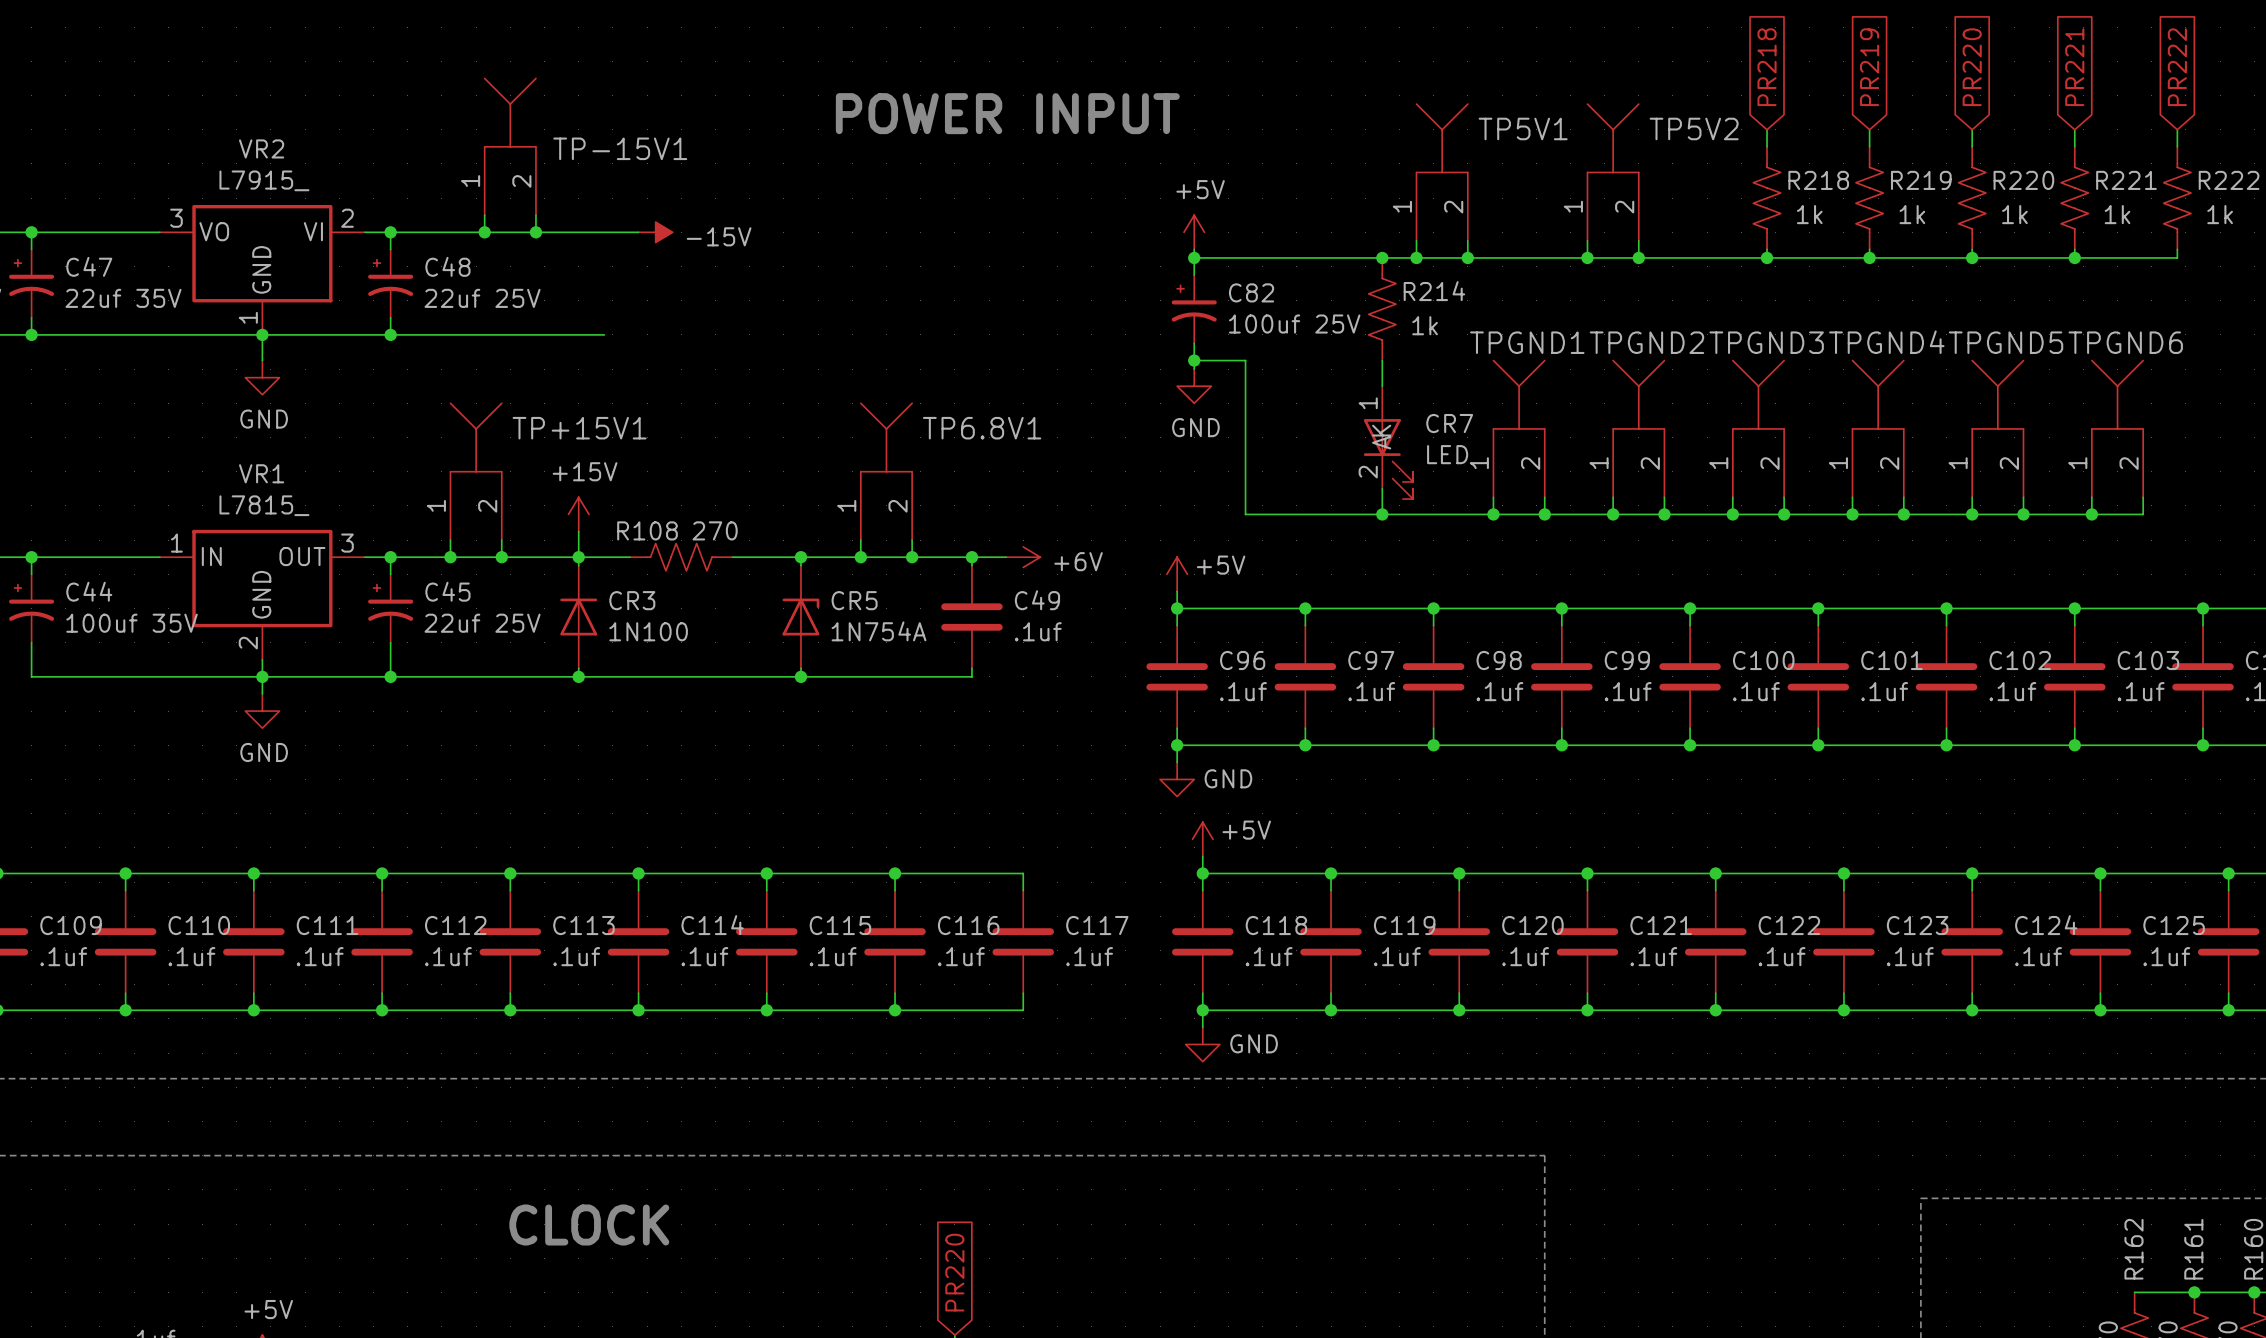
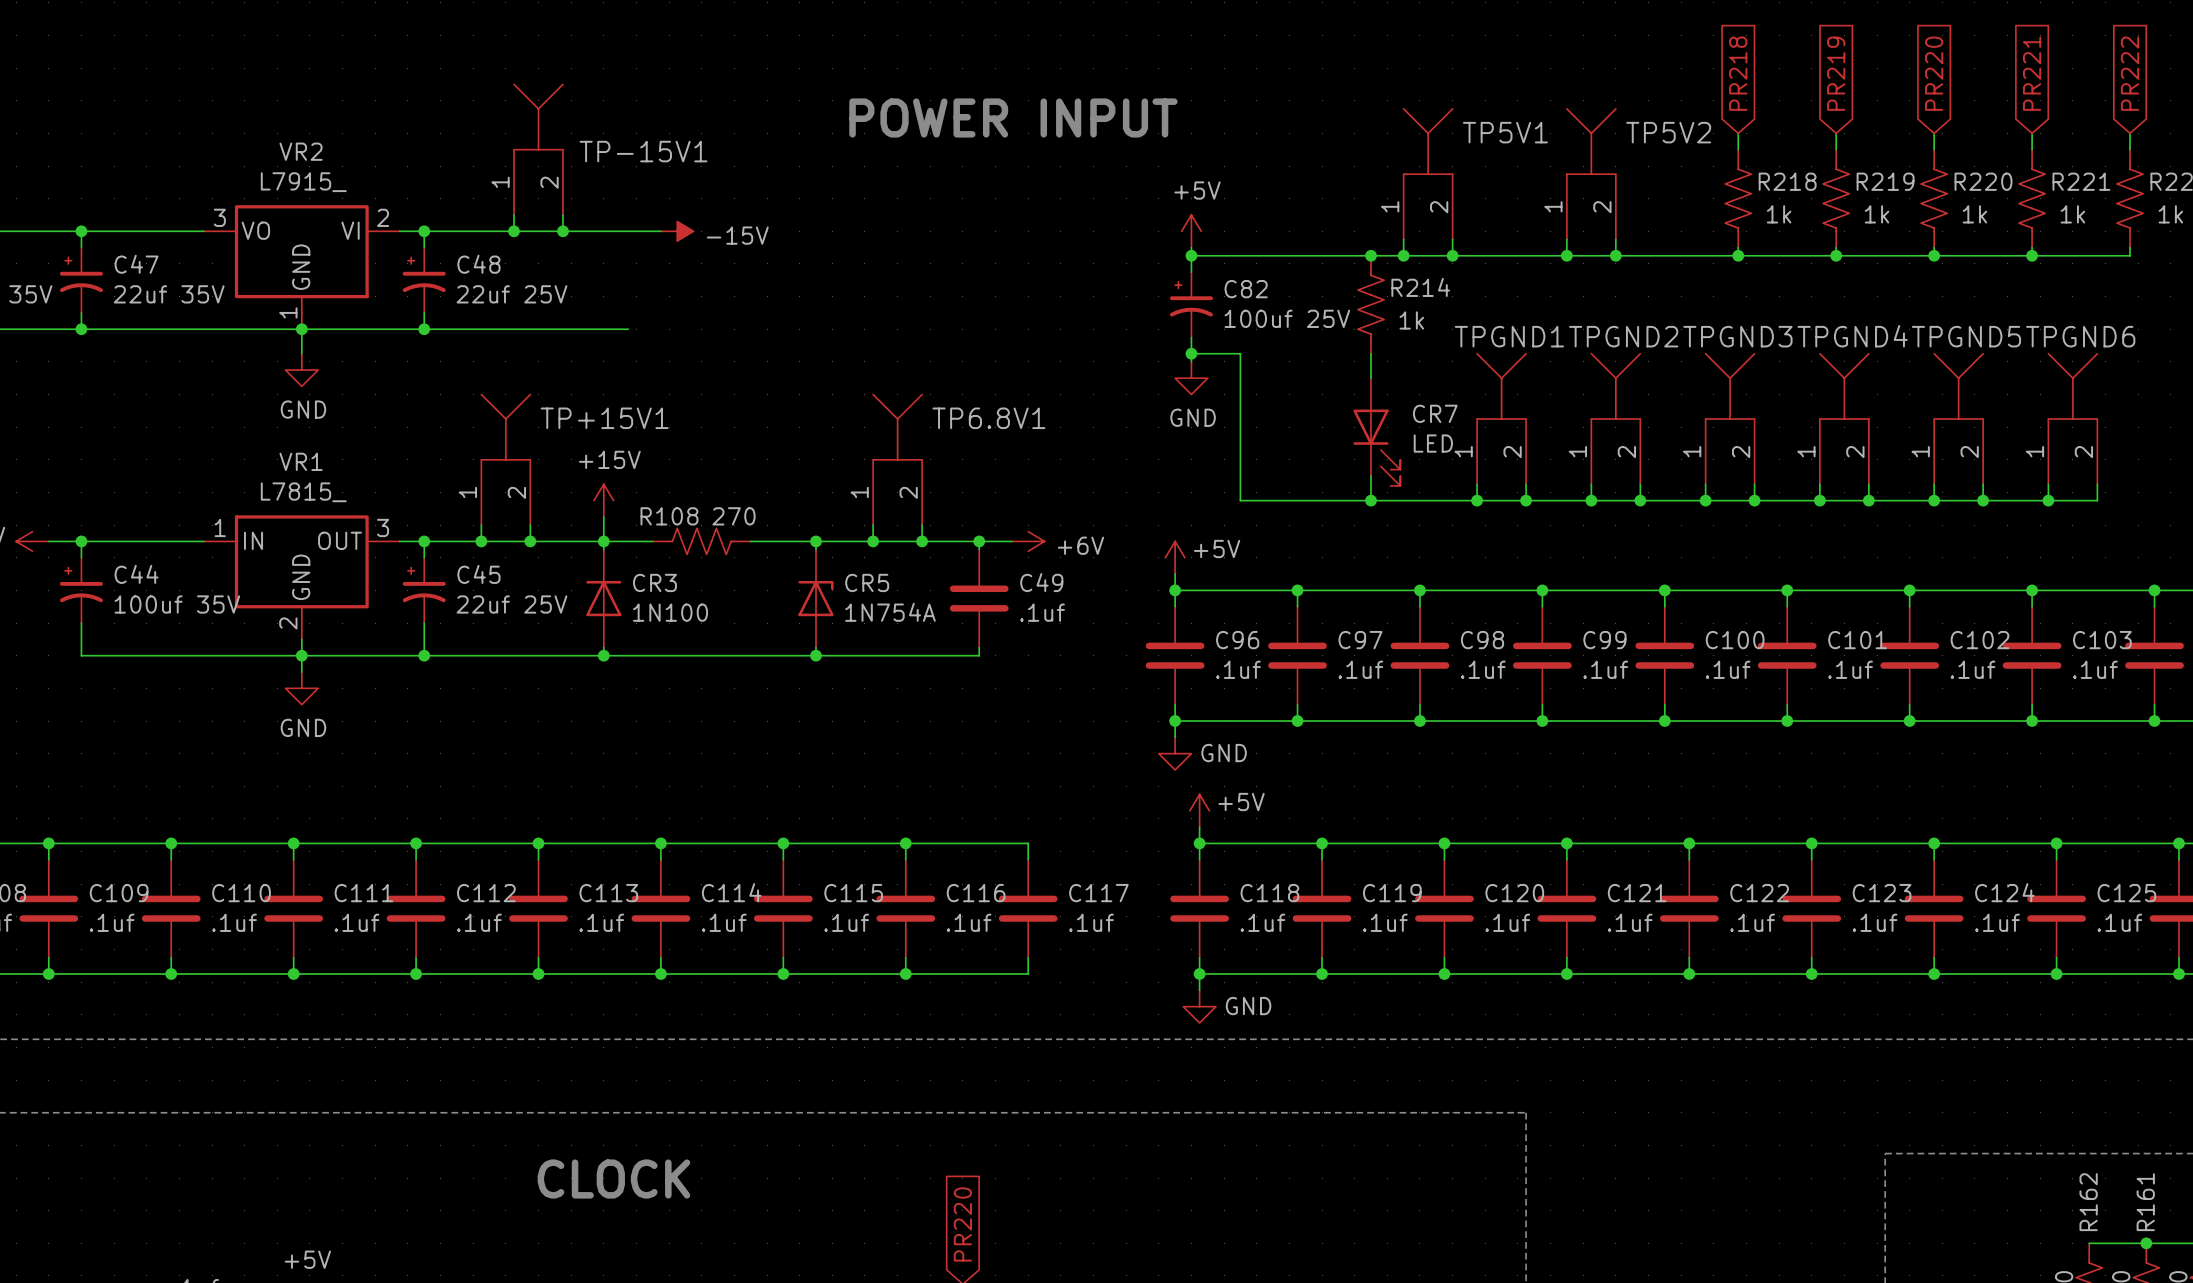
CR7 pin number: 1 (1368, 403) -> none
CR7 pin name: K (1381, 430) -> none
CR7 pin name: A (1381, 442) -> none
CR7 pin number: 2 (1368, 472) -> none

